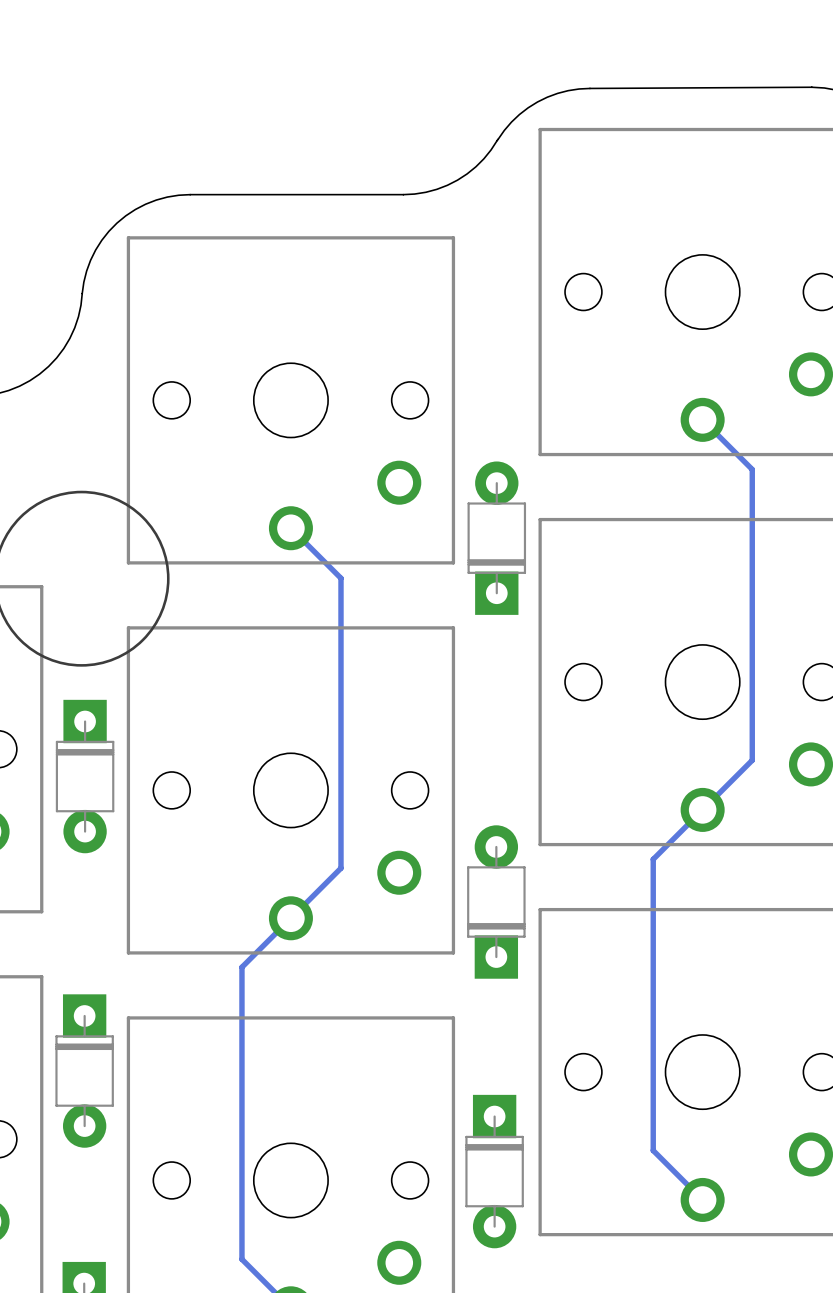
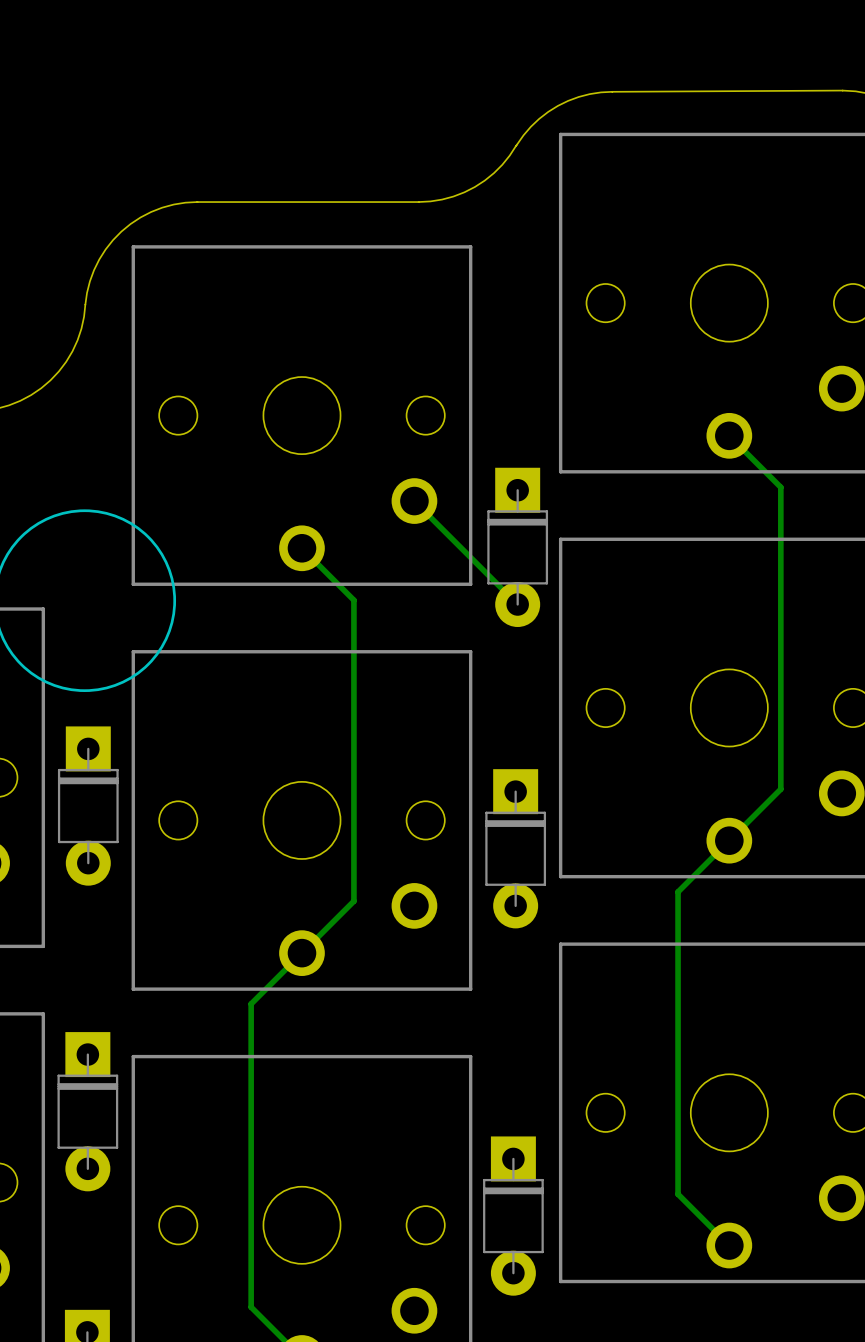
track: none -> (414, 501) (517, 604)
part rotation: 0° (496, 538) -> 180° (517, 547)
part rotation: 0° (496, 902) -> 180° (515, 848)

